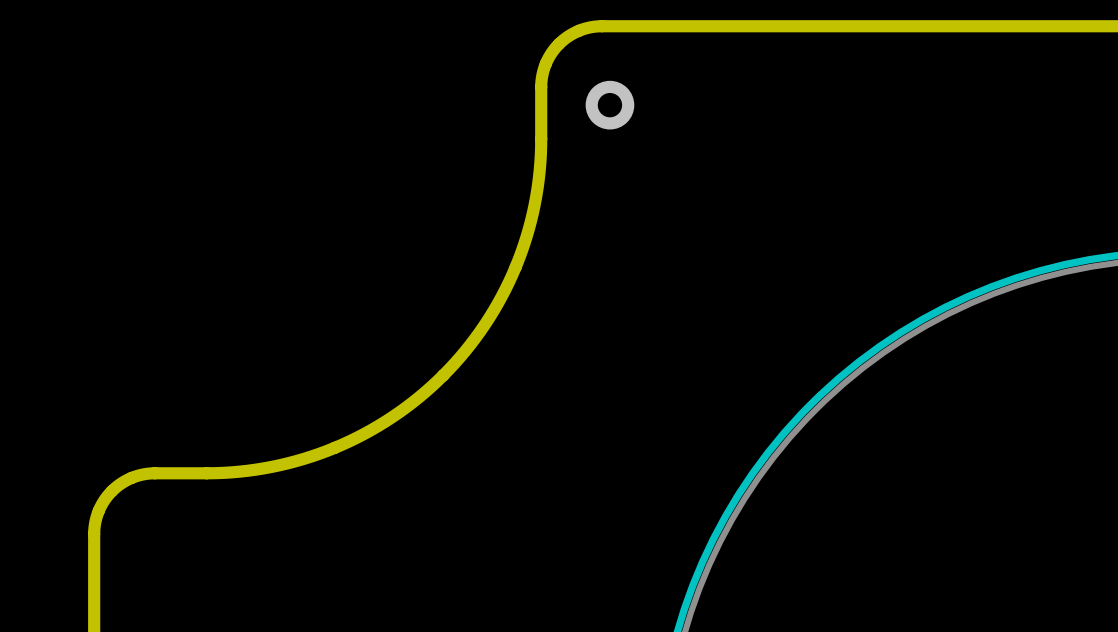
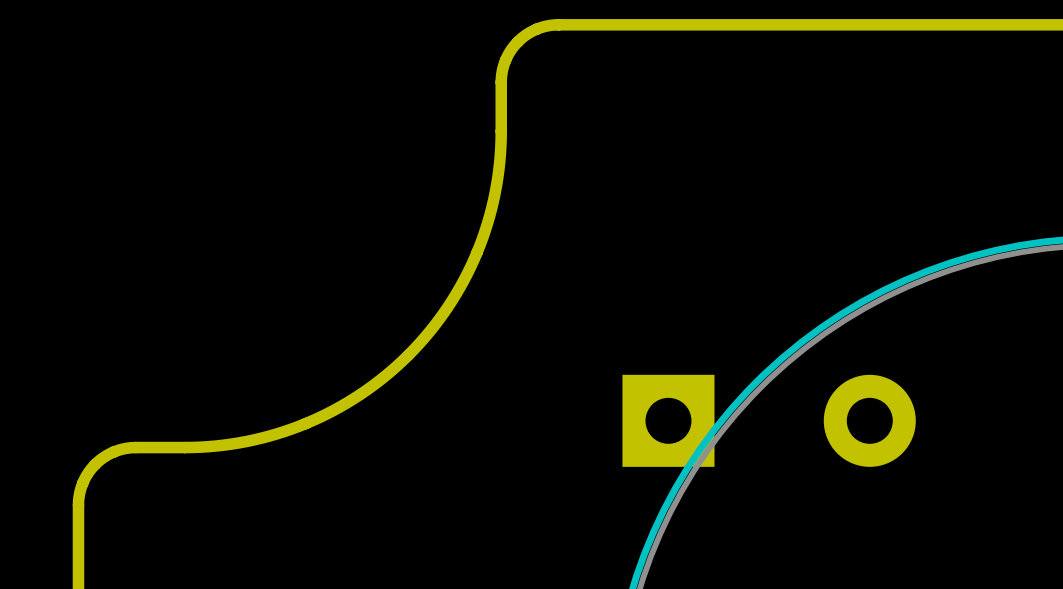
via: (609, 105) -> none
part: none -> (769, 420)

